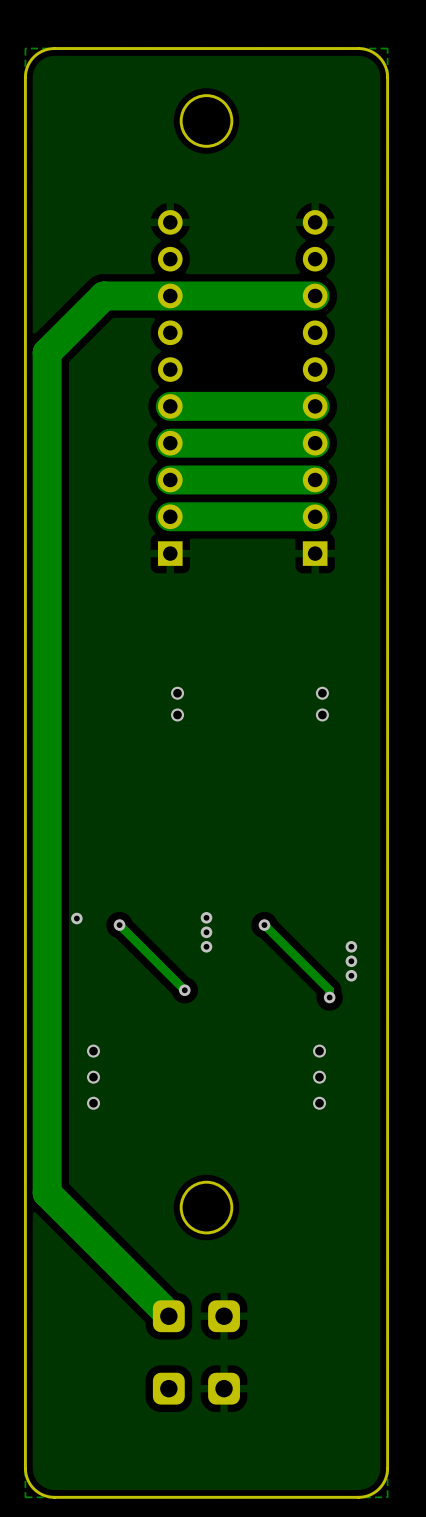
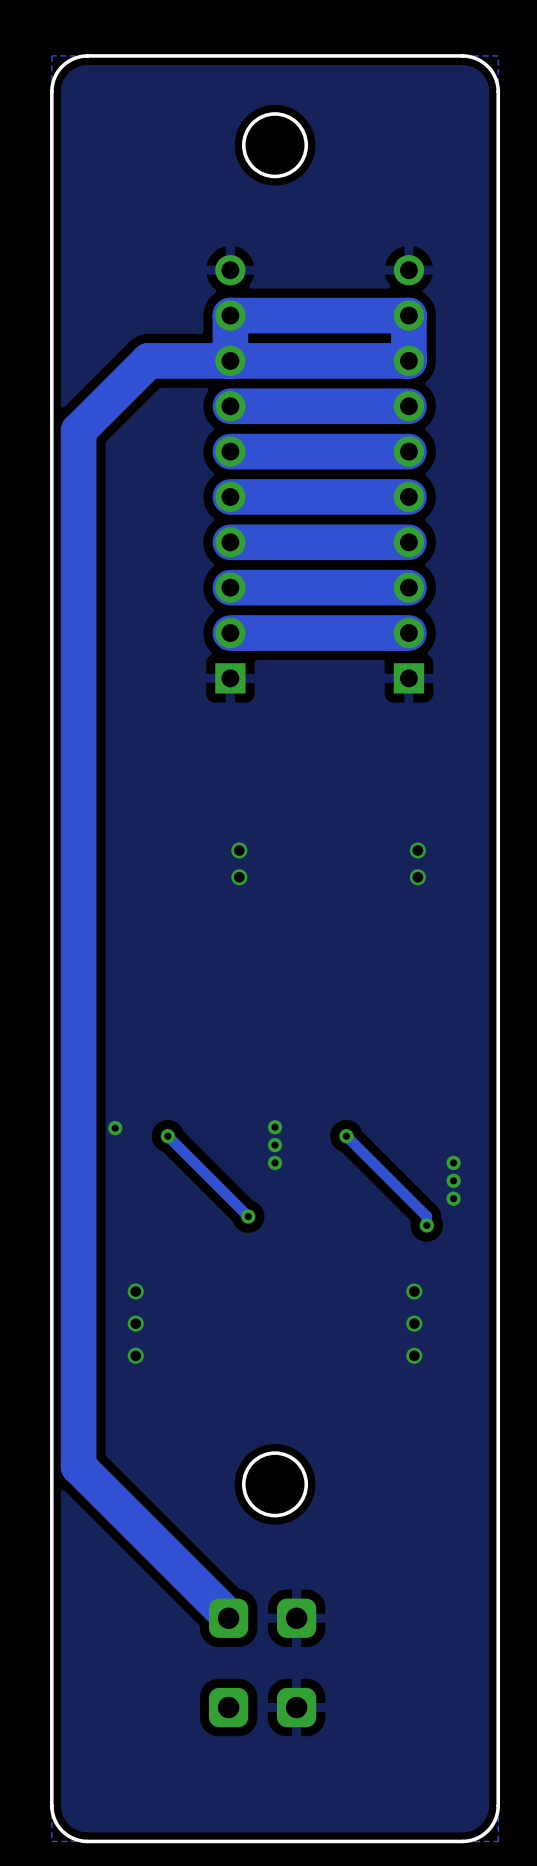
track: none -> (408, 360) (408, 315) (230, 315) (230, 360)
track: none -> (408, 406) (230, 406)
track: none -> (408, 451) (230, 451)

